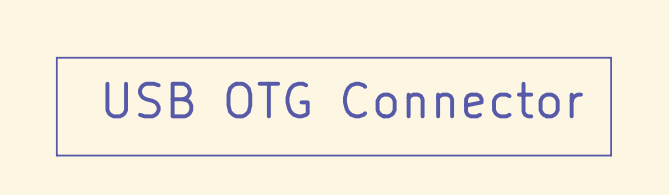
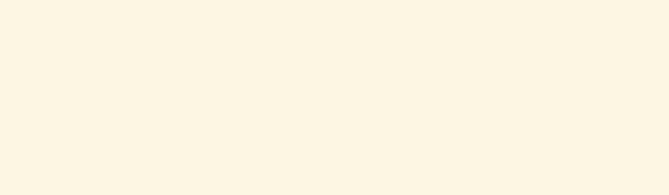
line: (56, 57) (611, 57) (611, 155) (56, 155) (56, 57) -> none
text: USB OTG Connector (344, 100) -> none

